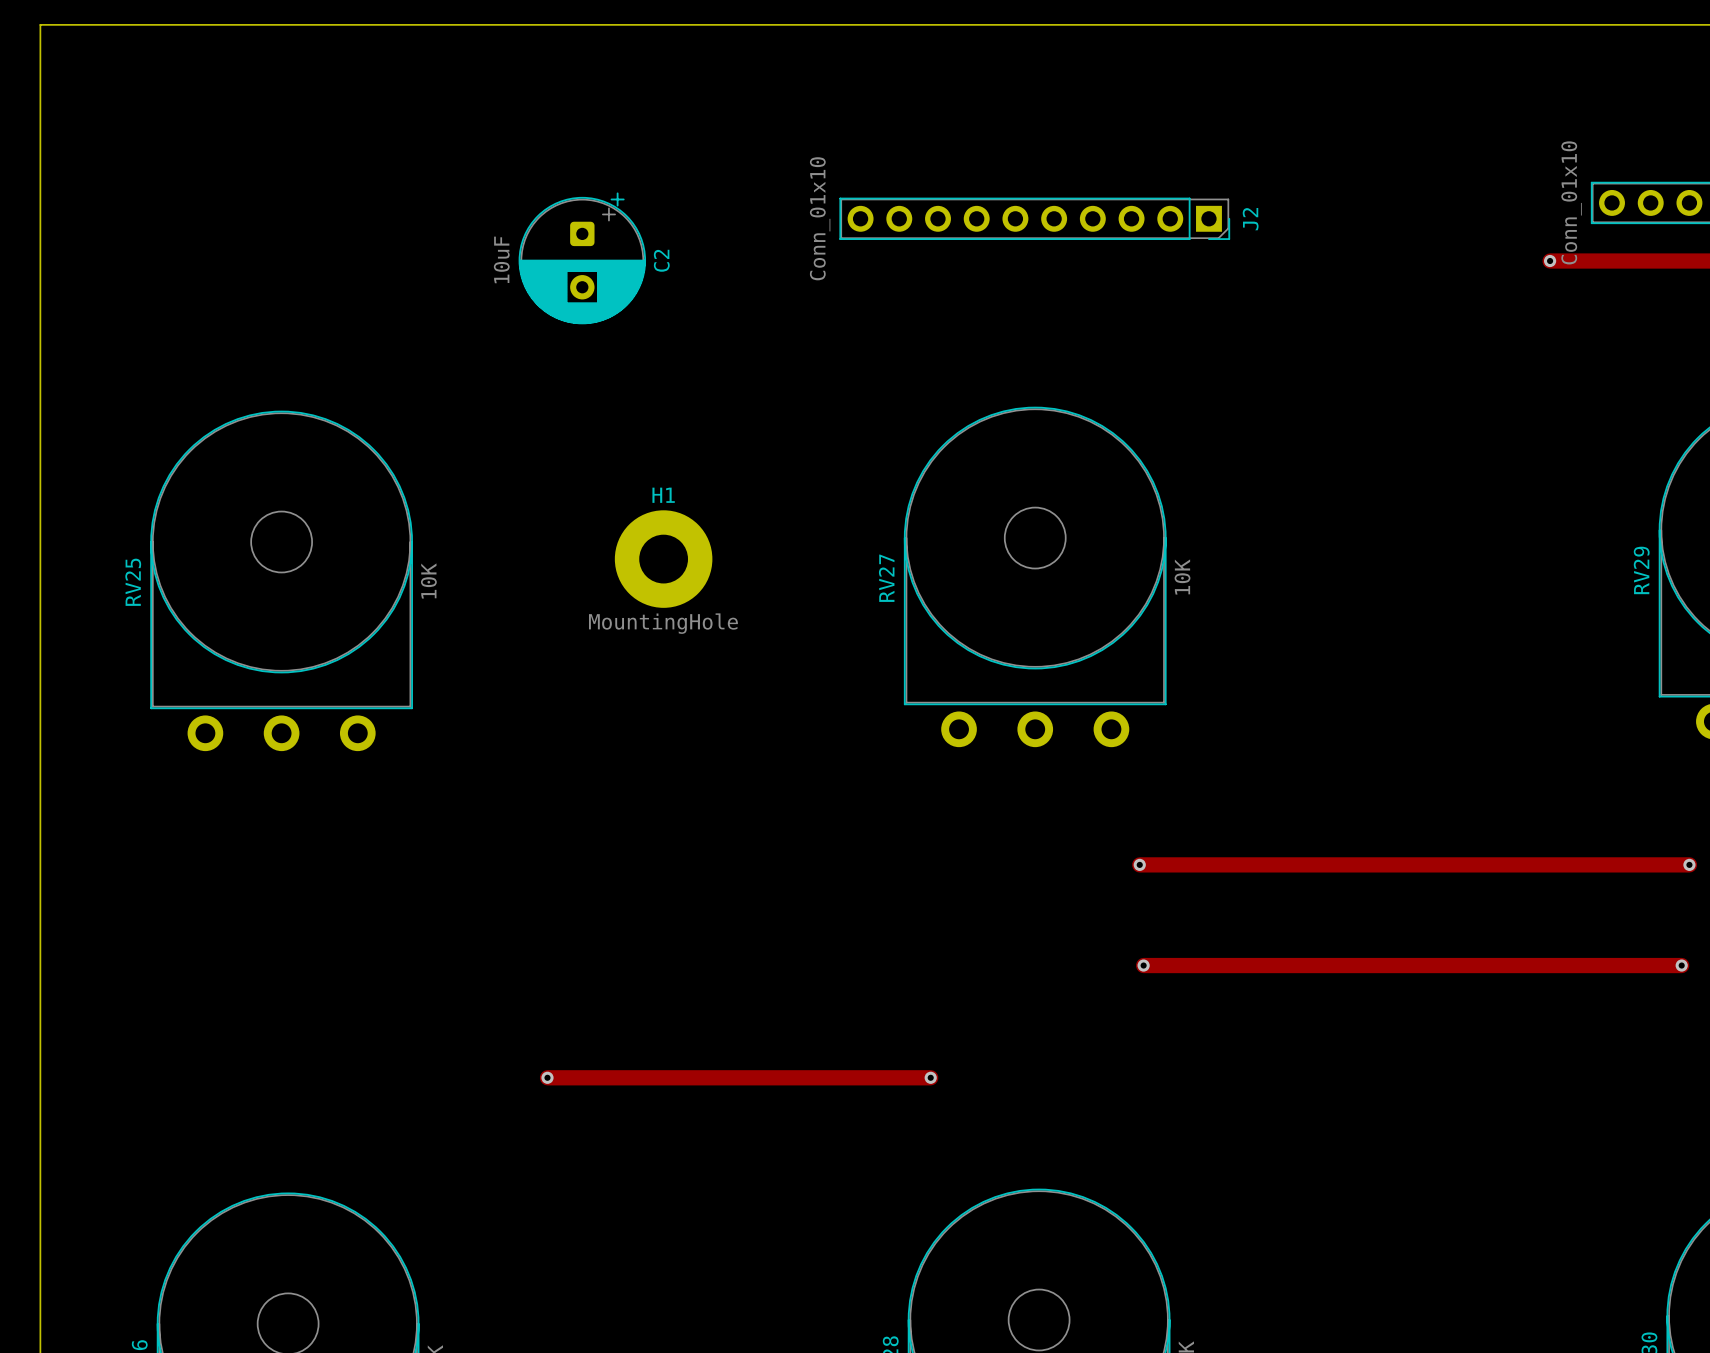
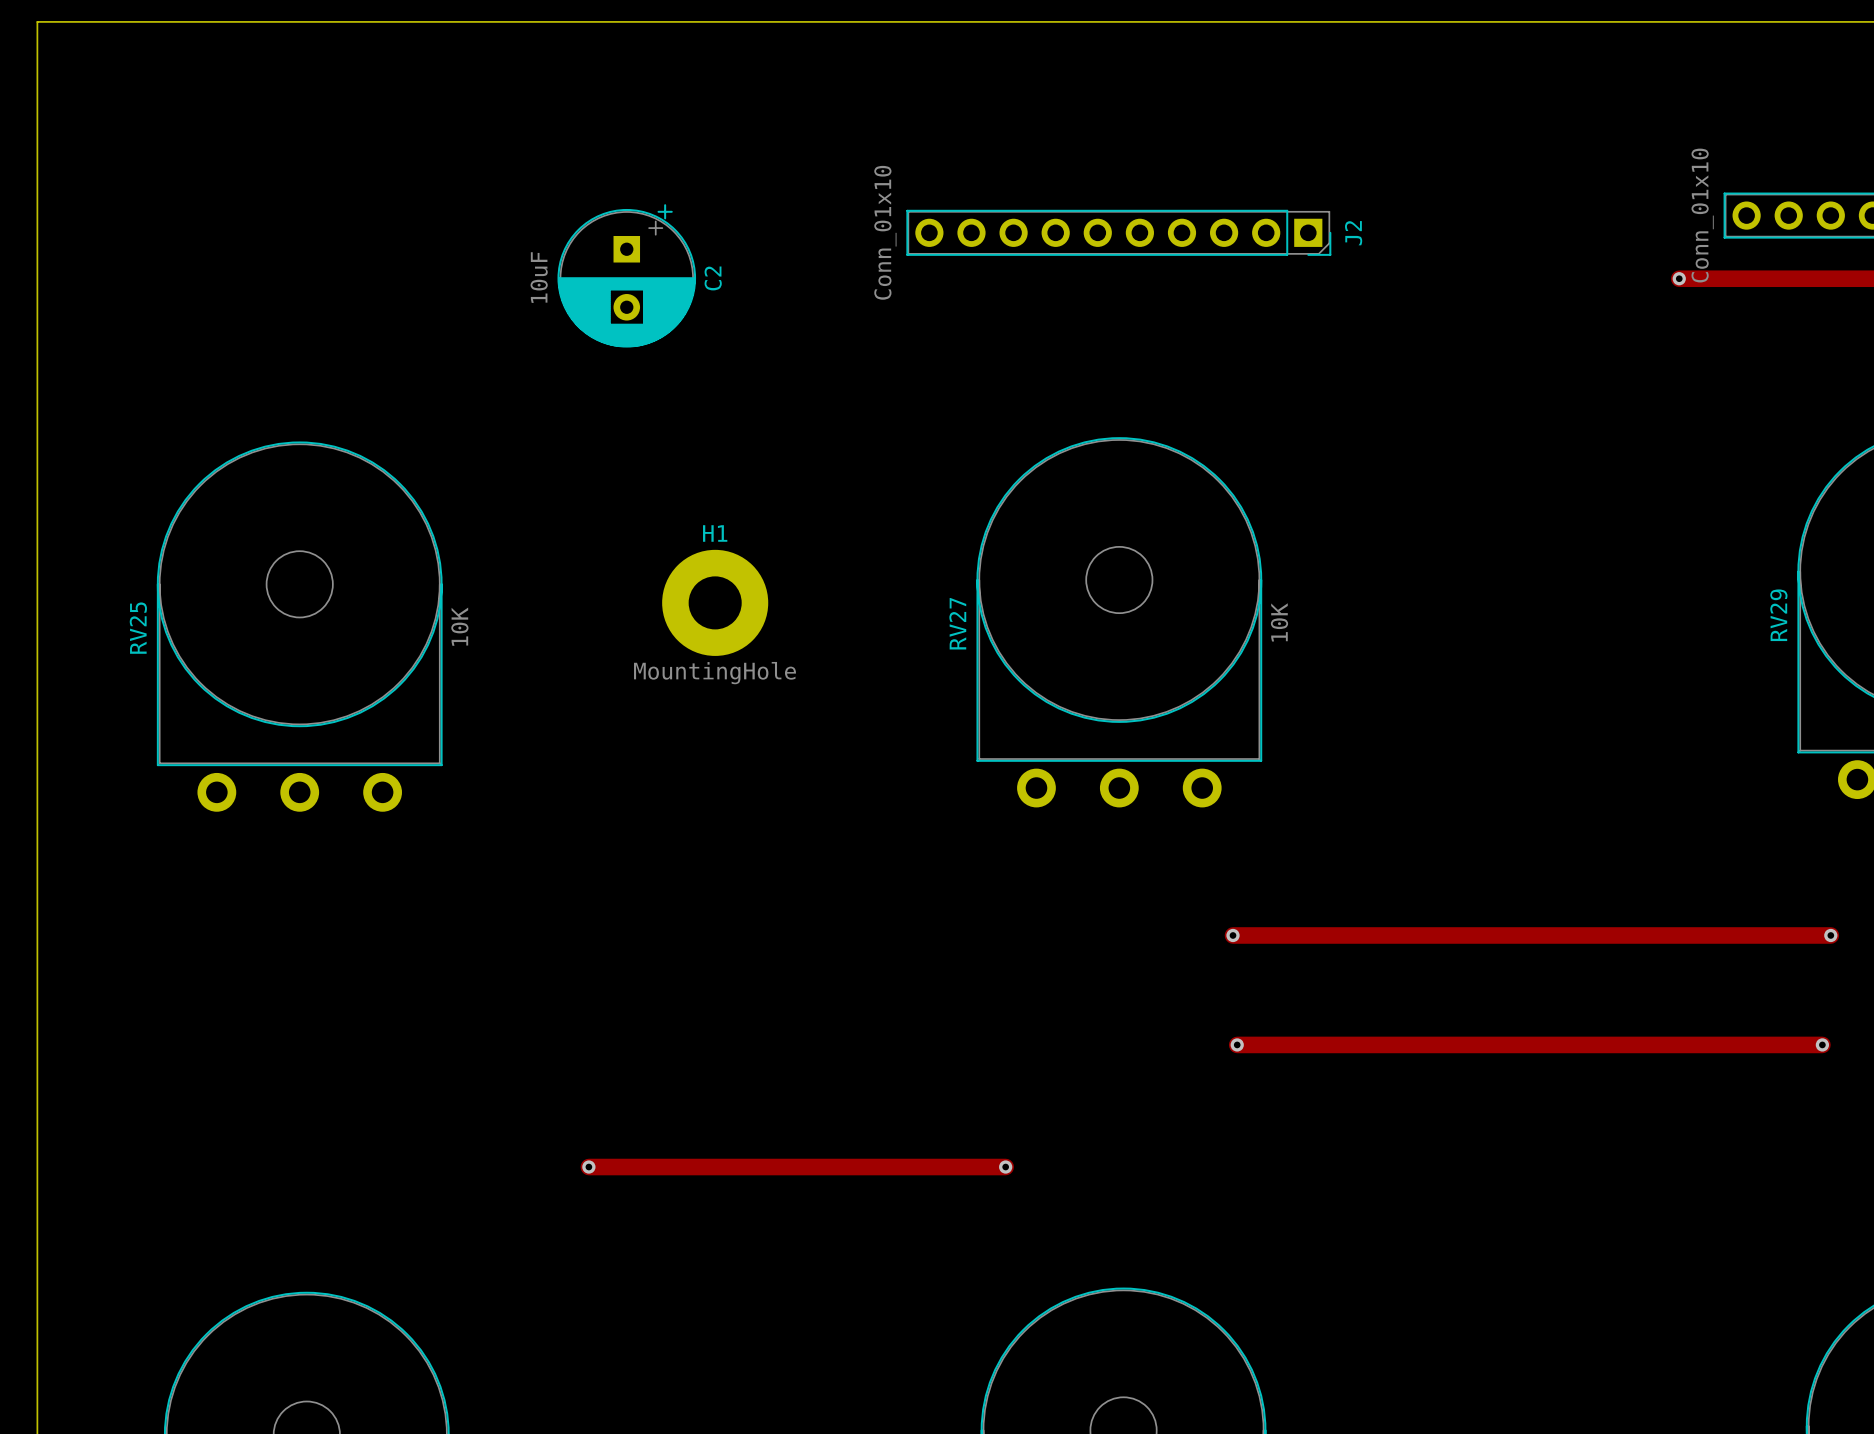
C2 footprint: [518, 192, 647, 325] -> [557, 204, 697, 348]

